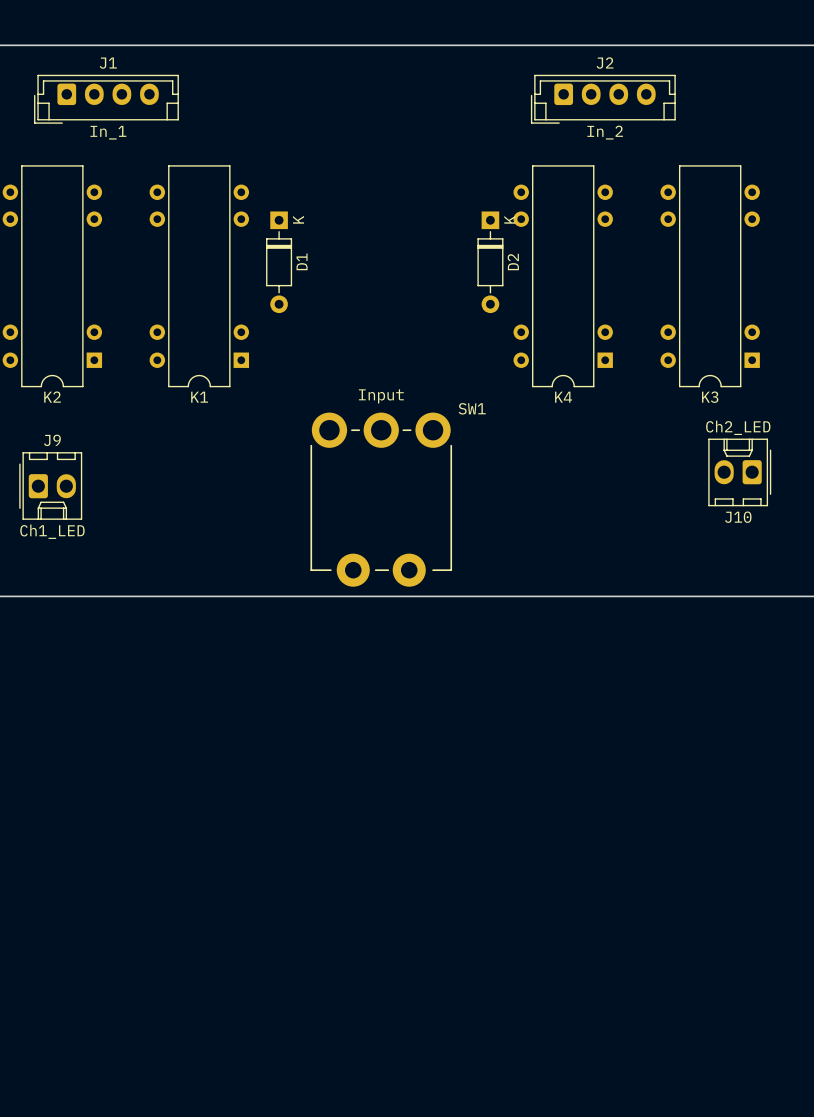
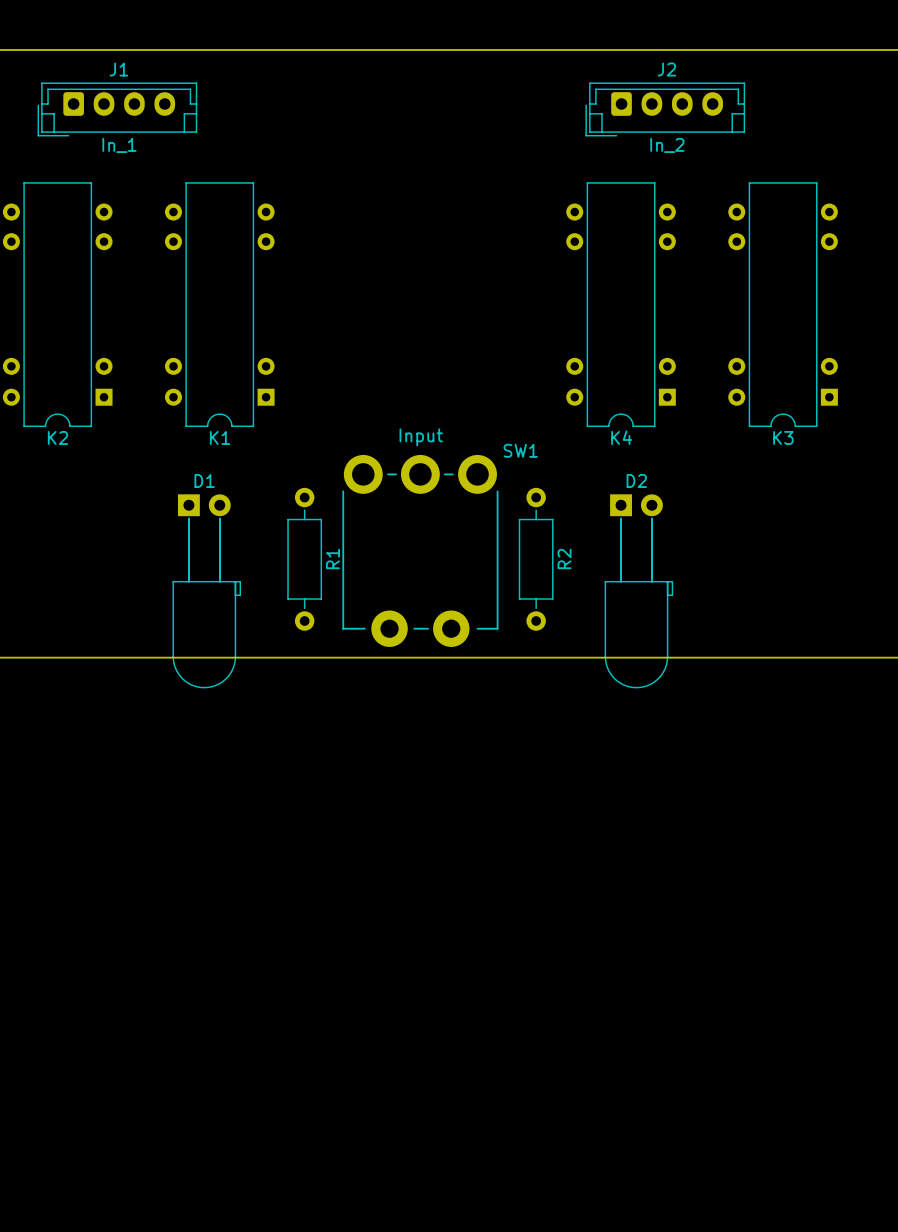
D1 footprint: [266, 211, 293, 314] -> [172, 494, 242, 689]
D2 footprint: [477, 211, 504, 314] -> [604, 494, 674, 689]
D1 name position: D1 (302, 261) -> D1 (204, 480)
D2 name position: D2 (513, 262) -> D2 (636, 480)
J10: Ch2_LED (739, 472) -> none
J9: Ch1_LED (50, 485) -> none
R1: none -> (304, 559)
R2: none -> (536, 559)

